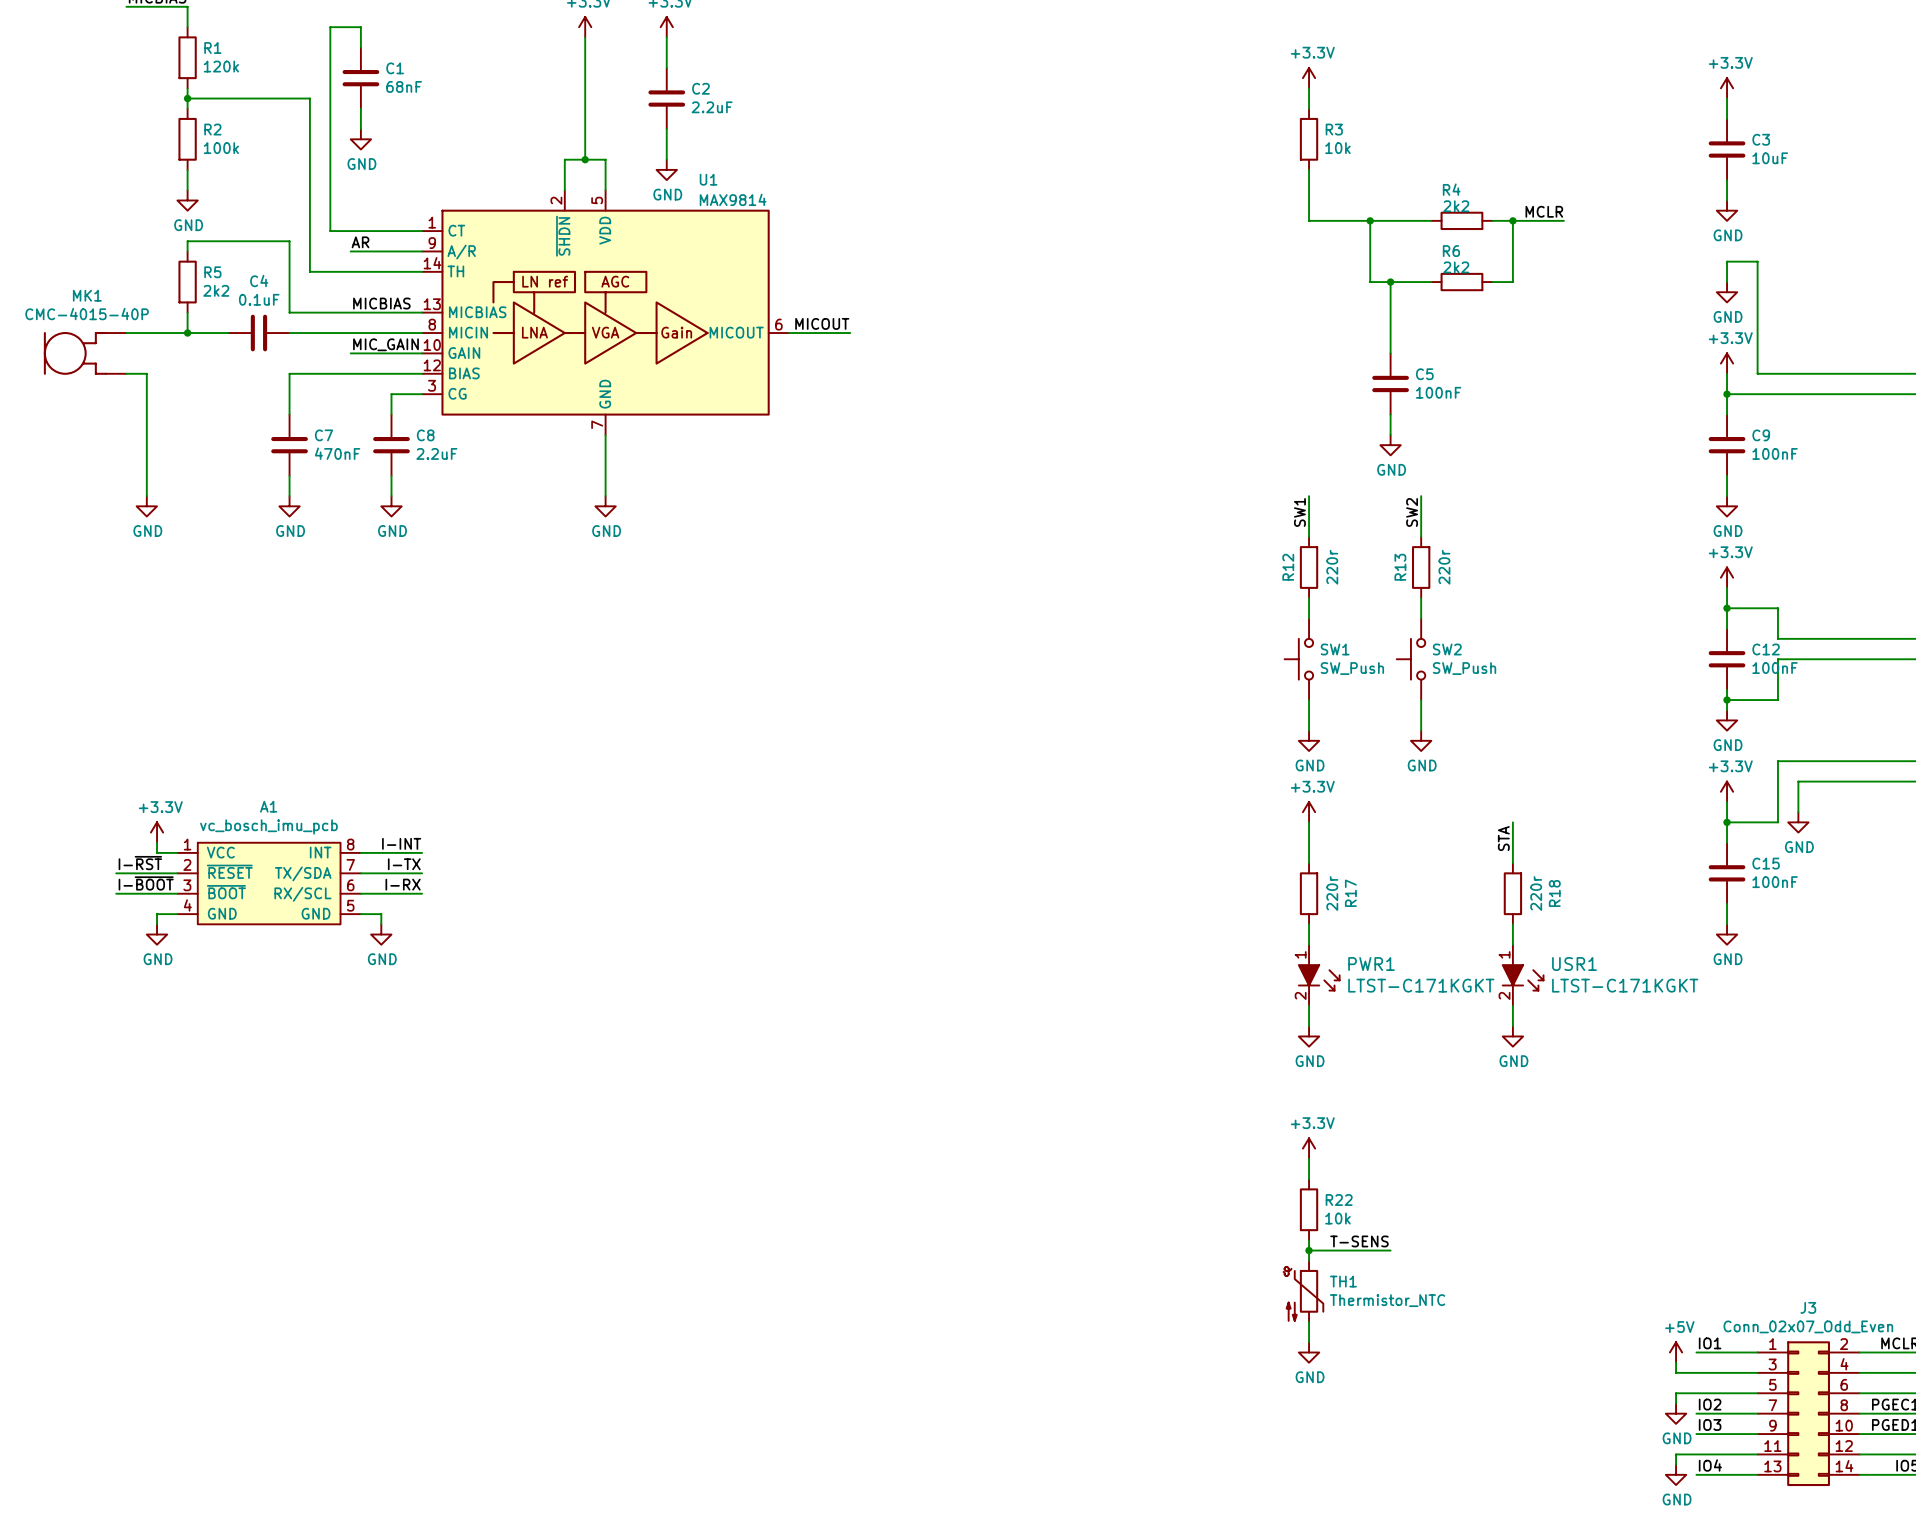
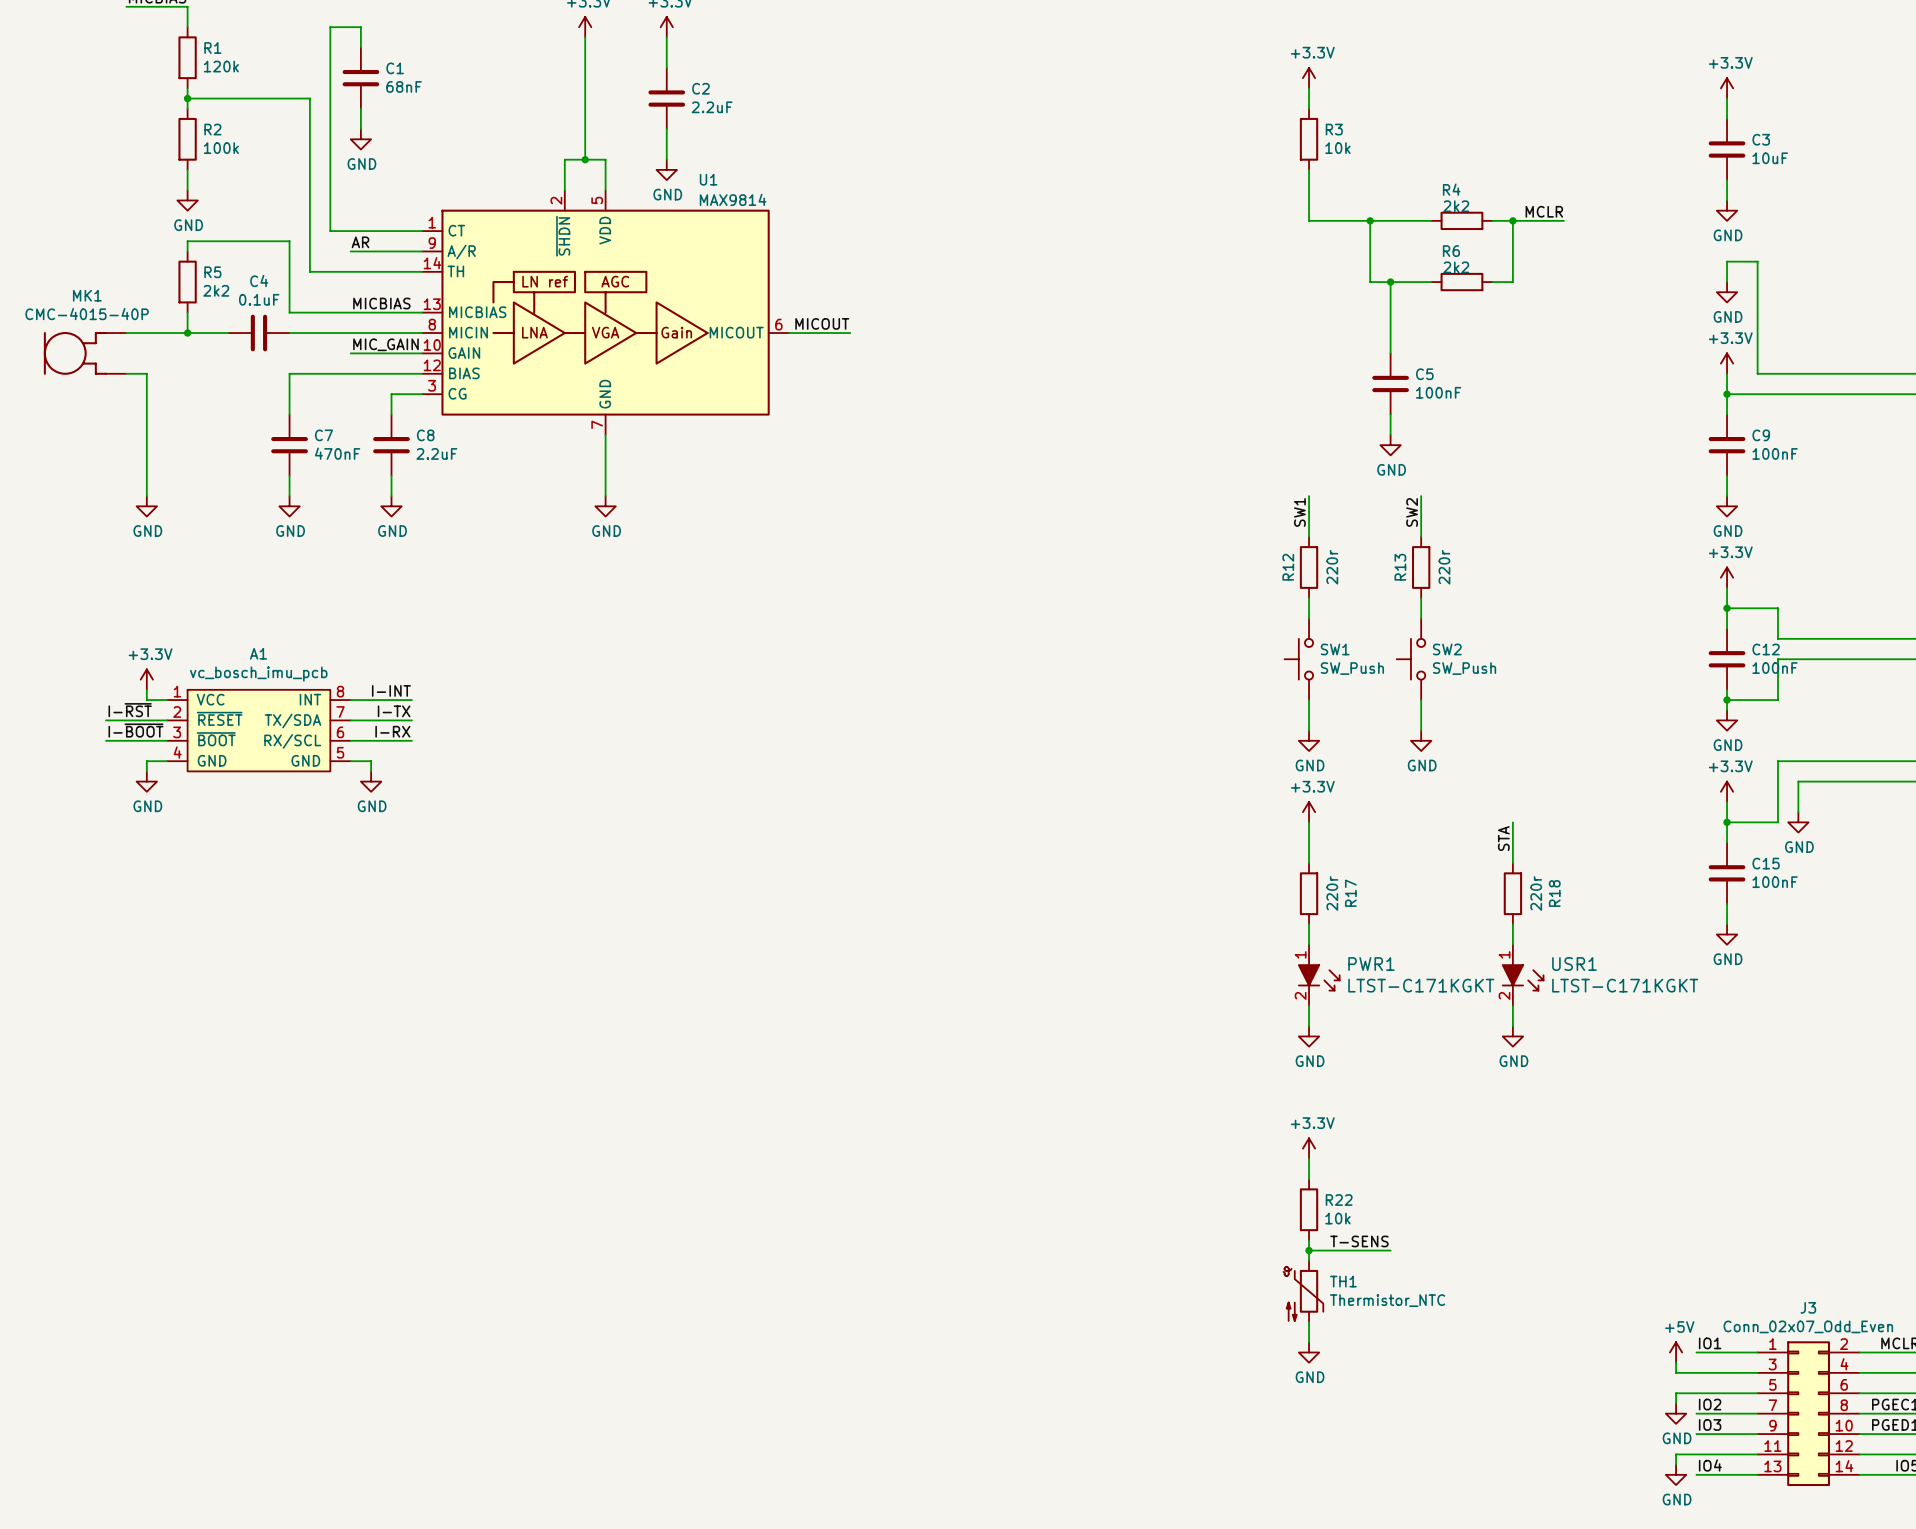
power symbol: none -> GND (146, 781)
power symbol: none -> GND (371, 781)
power symbol position: +3.3V (157, 832) -> +3.3V (146, 679)
wire: (157, 842) (157, 852) (177, 852) -> (146, 689) (146, 700) (167, 700)
label position: I-INT (401, 843) -> I-INT (391, 690)
wire: (360, 852) (422, 852) -> (350, 700) (411, 700)
label position: I-~{RST} (140, 863) -> I-~{RST} (130, 710)
label position: I-TX (404, 864) -> I-TX (394, 711)
wire: (116, 873) (177, 873) -> (106, 720) (167, 720)
wire: (360, 873) (422, 873) -> (350, 720) (411, 720)
label position: I-~{BOOT} (146, 883) -> I-~{BOOT} (135, 730)
A1 position: (269, 883) -> (258, 730)
label position: I-RX (403, 884) -> I-RX (392, 731)
wire: (116, 893) (177, 893) -> (106, 740) (167, 740)
wire: (360, 893) (422, 893) -> (350, 740) (411, 740)
wire: (177, 914) (157, 914) (157, 924) -> (167, 761) (146, 761) (146, 771)
wire: (360, 914) (381, 914) (381, 924) -> (350, 761) (371, 761) (371, 771)
power symbol: GND (157, 934) -> none
power symbol: GND (381, 934) -> none

